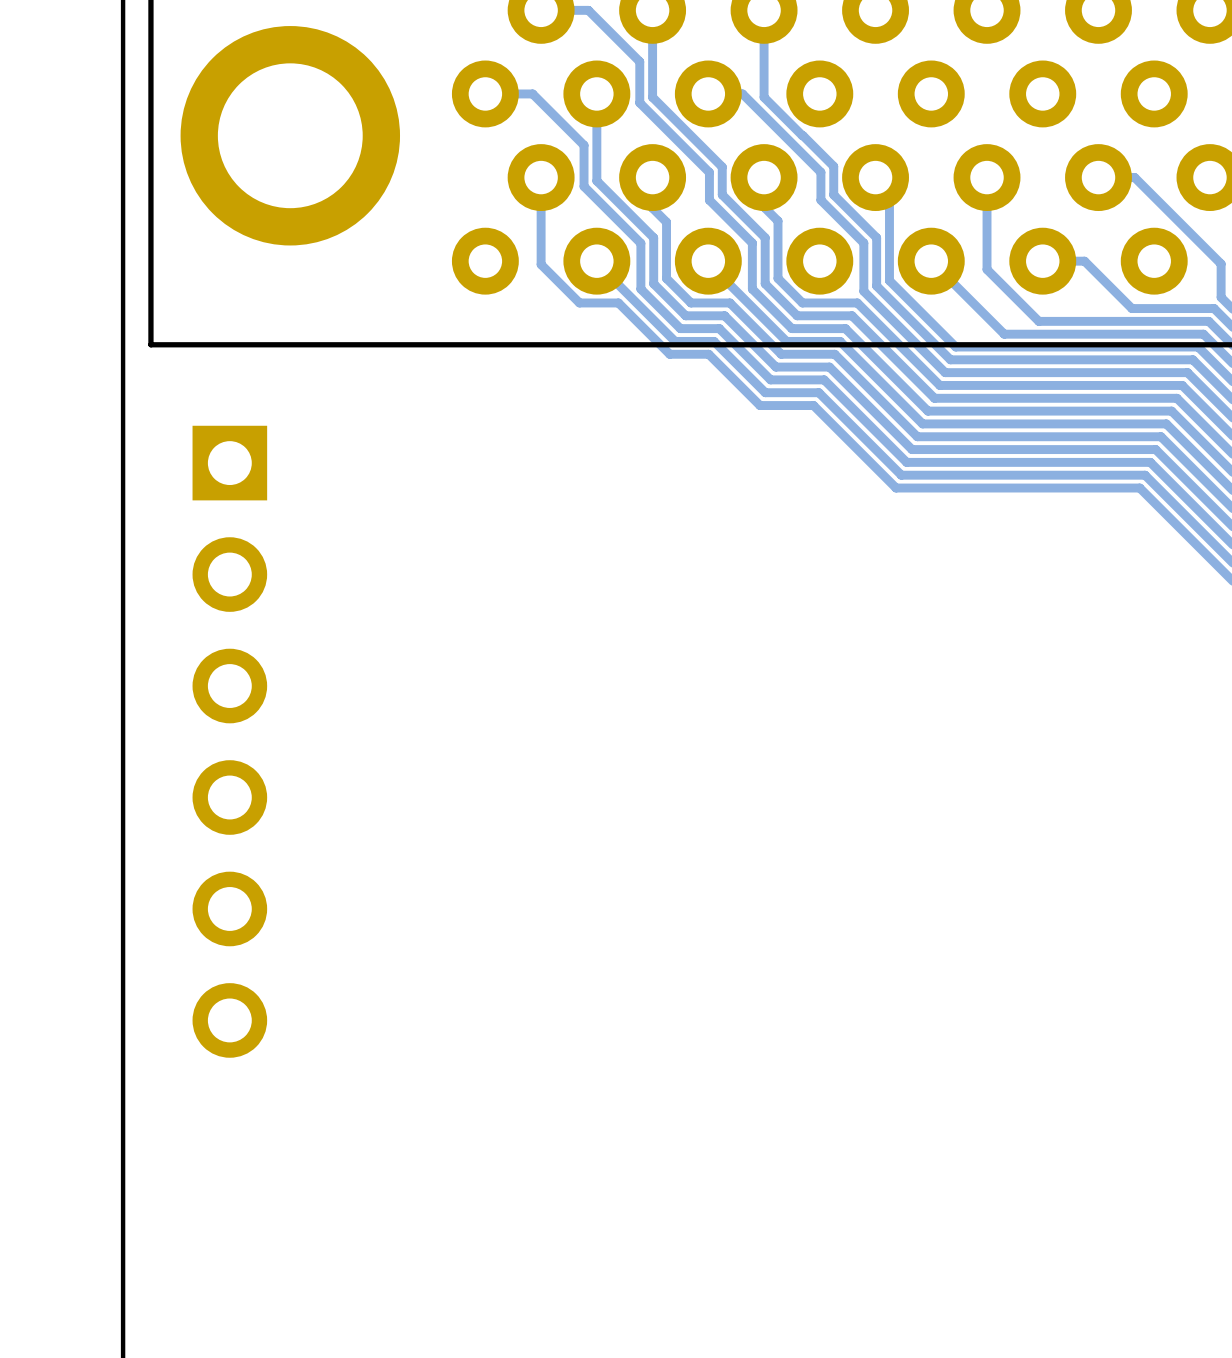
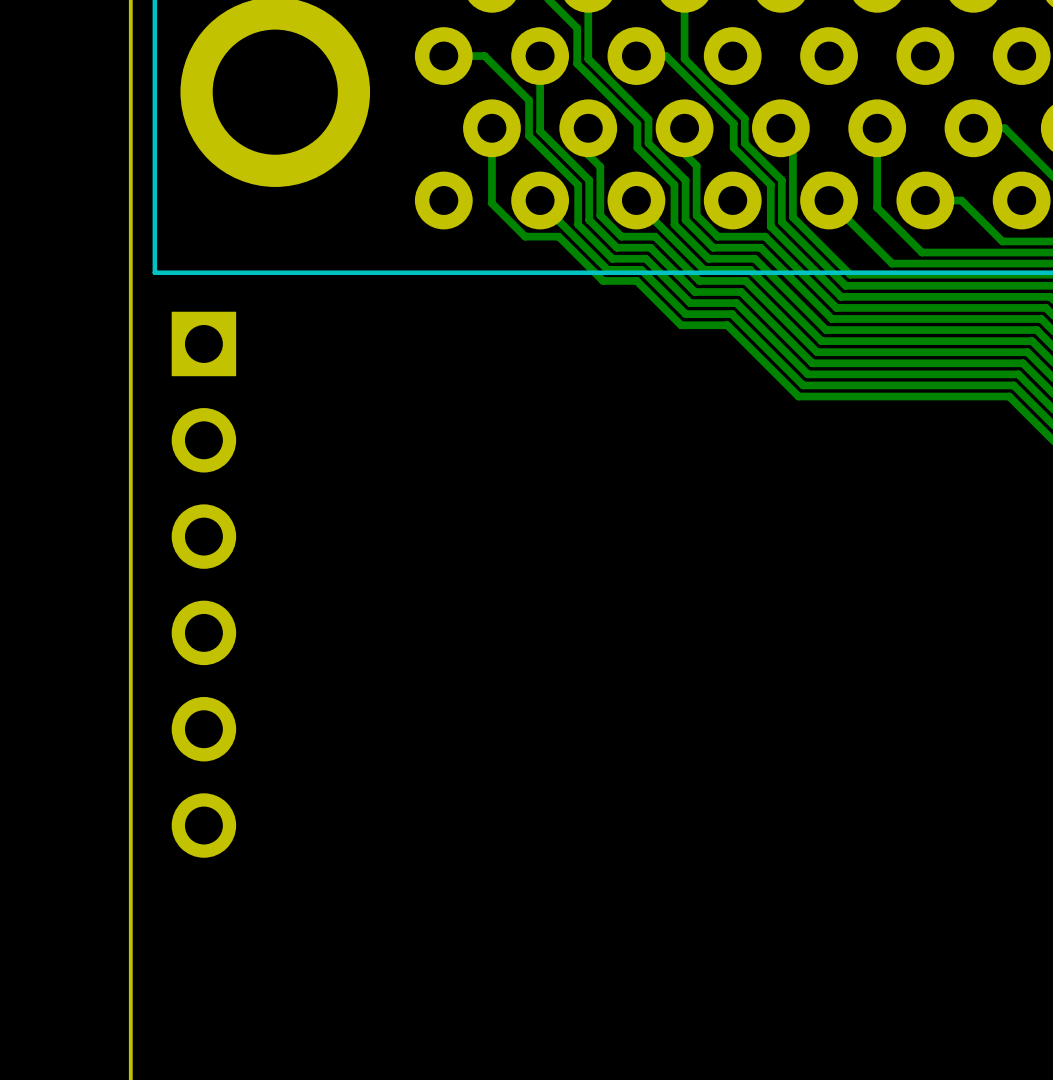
part position: (229, 741) -> (203, 584)

